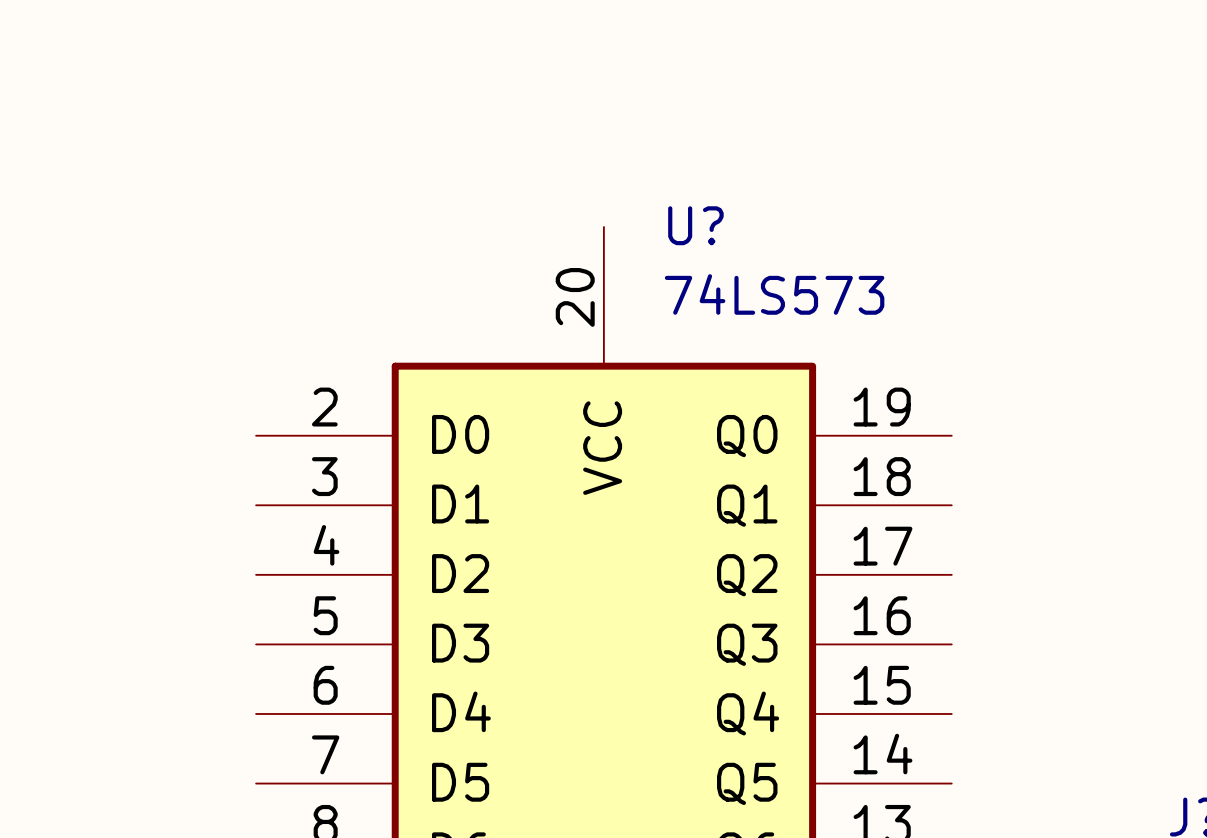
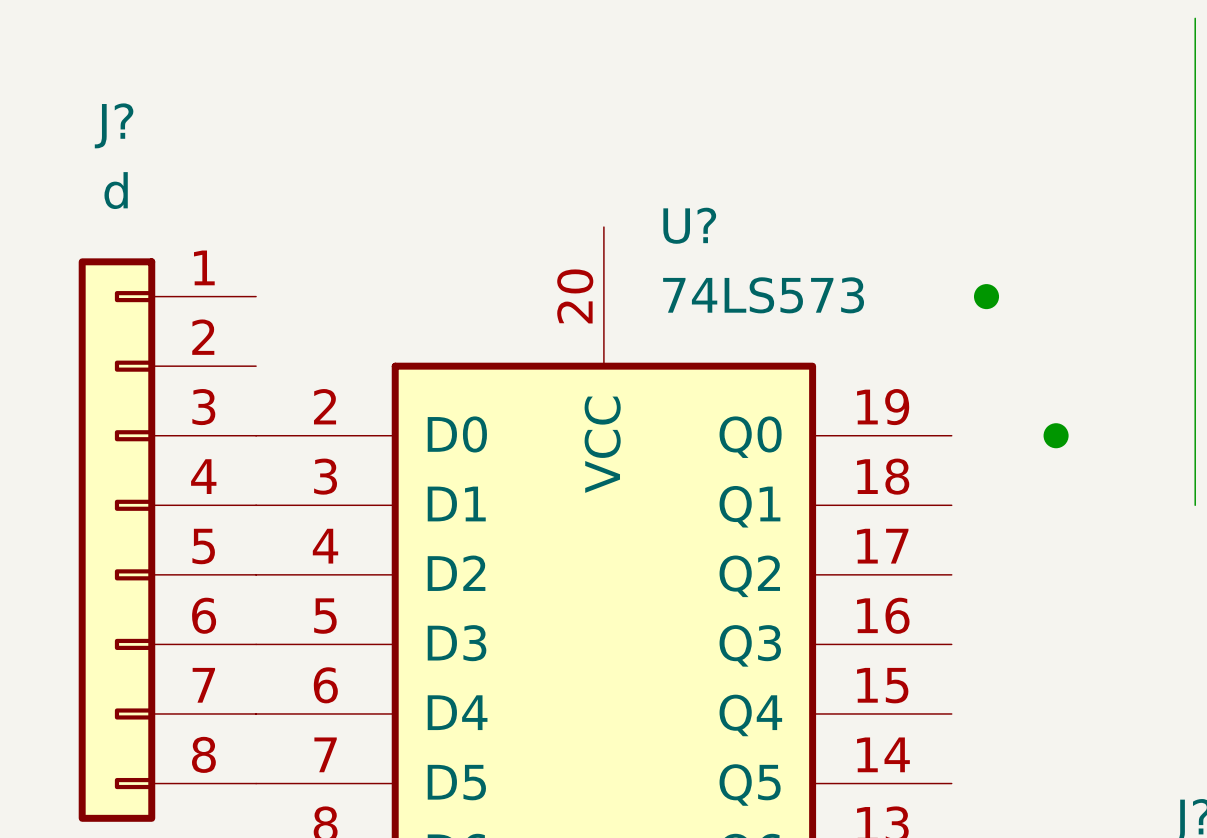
wire: none -> (1195, 18) (1195, 505)
junction: none -> (986, 296)
junction: none -> (1056, 435)
J?: none -> d (167, 540)

